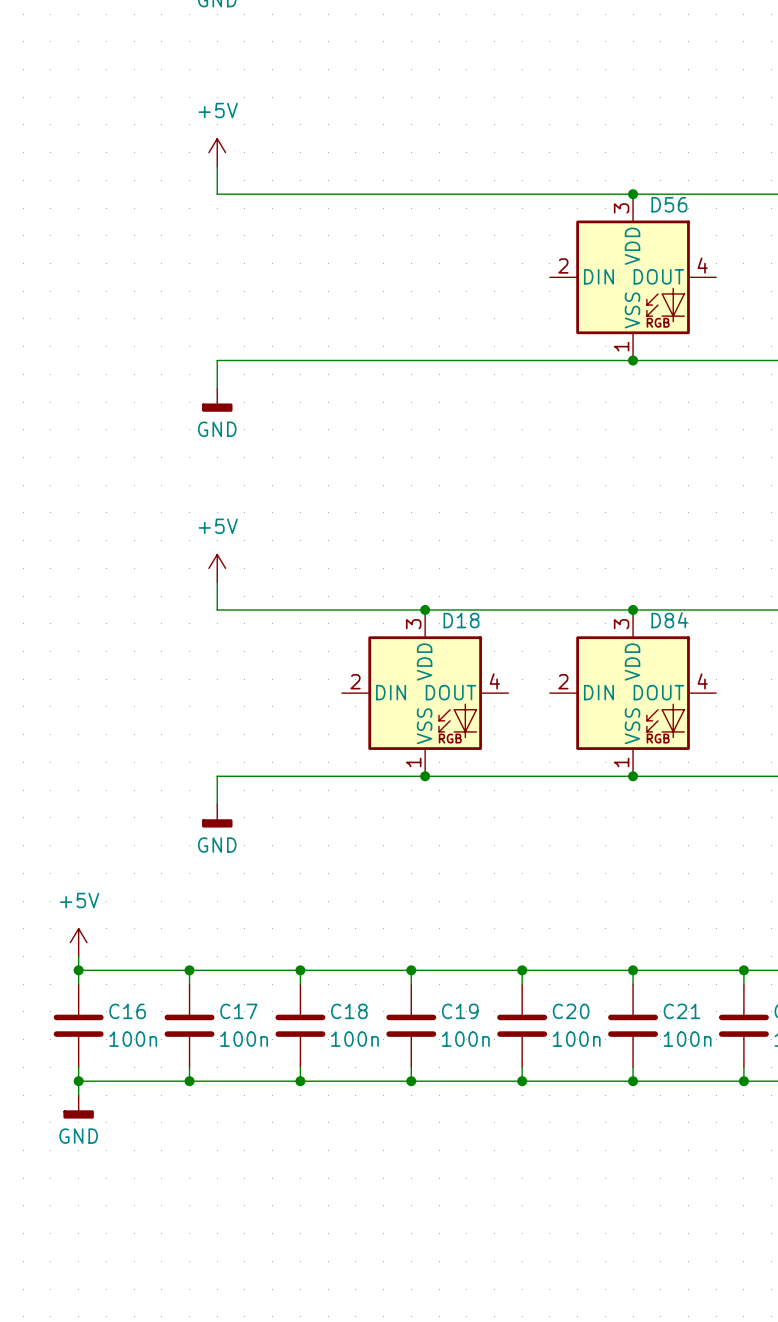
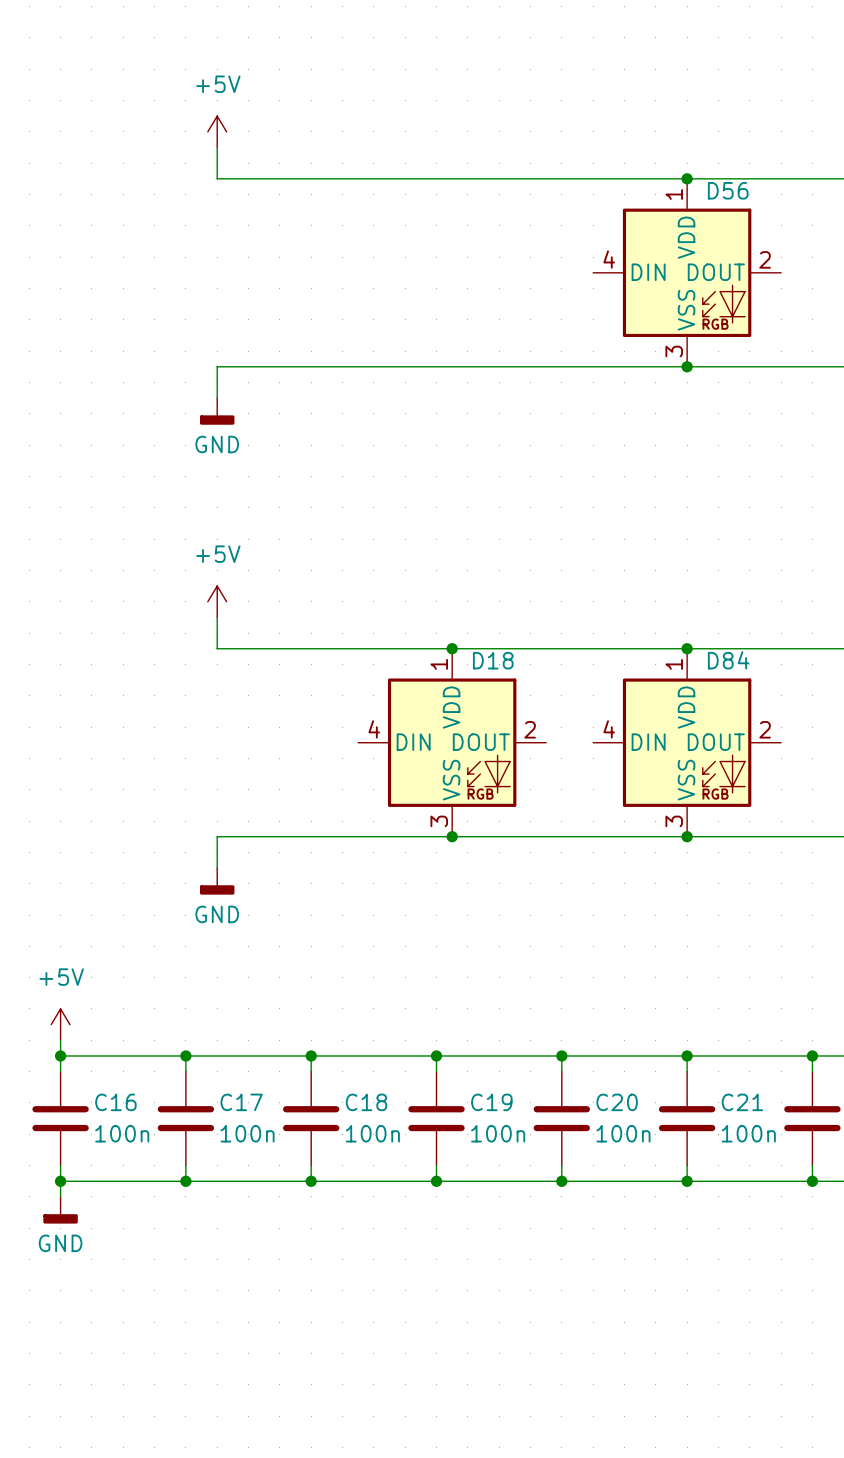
D56 pin number: 3 (621, 208) -> 1 (674, 194)
D56 pin number: 2 (563, 265) -> 4 (609, 259)
D56 pin number: 4 (702, 265) -> 2 (765, 259)
D56 pin number: 1 (621, 346) -> 3 (674, 351)
D18 pin number: 3 (413, 624) -> 1 (439, 664)
D84 pin number: 3 (621, 624) -> 1 (674, 664)
D18 pin number: 2 (355, 681) -> 4 (374, 729)
D18 pin number: 4 (494, 681) -> 2 (530, 729)
D84 pin number: 2 (563, 681) -> 4 (609, 729)
D84 pin number: 4 (702, 681) -> 2 (765, 729)
D18 pin number: 1 (413, 762) -> 3 (439, 821)
D84 pin number: 1 (621, 762) -> 3 (674, 821)

